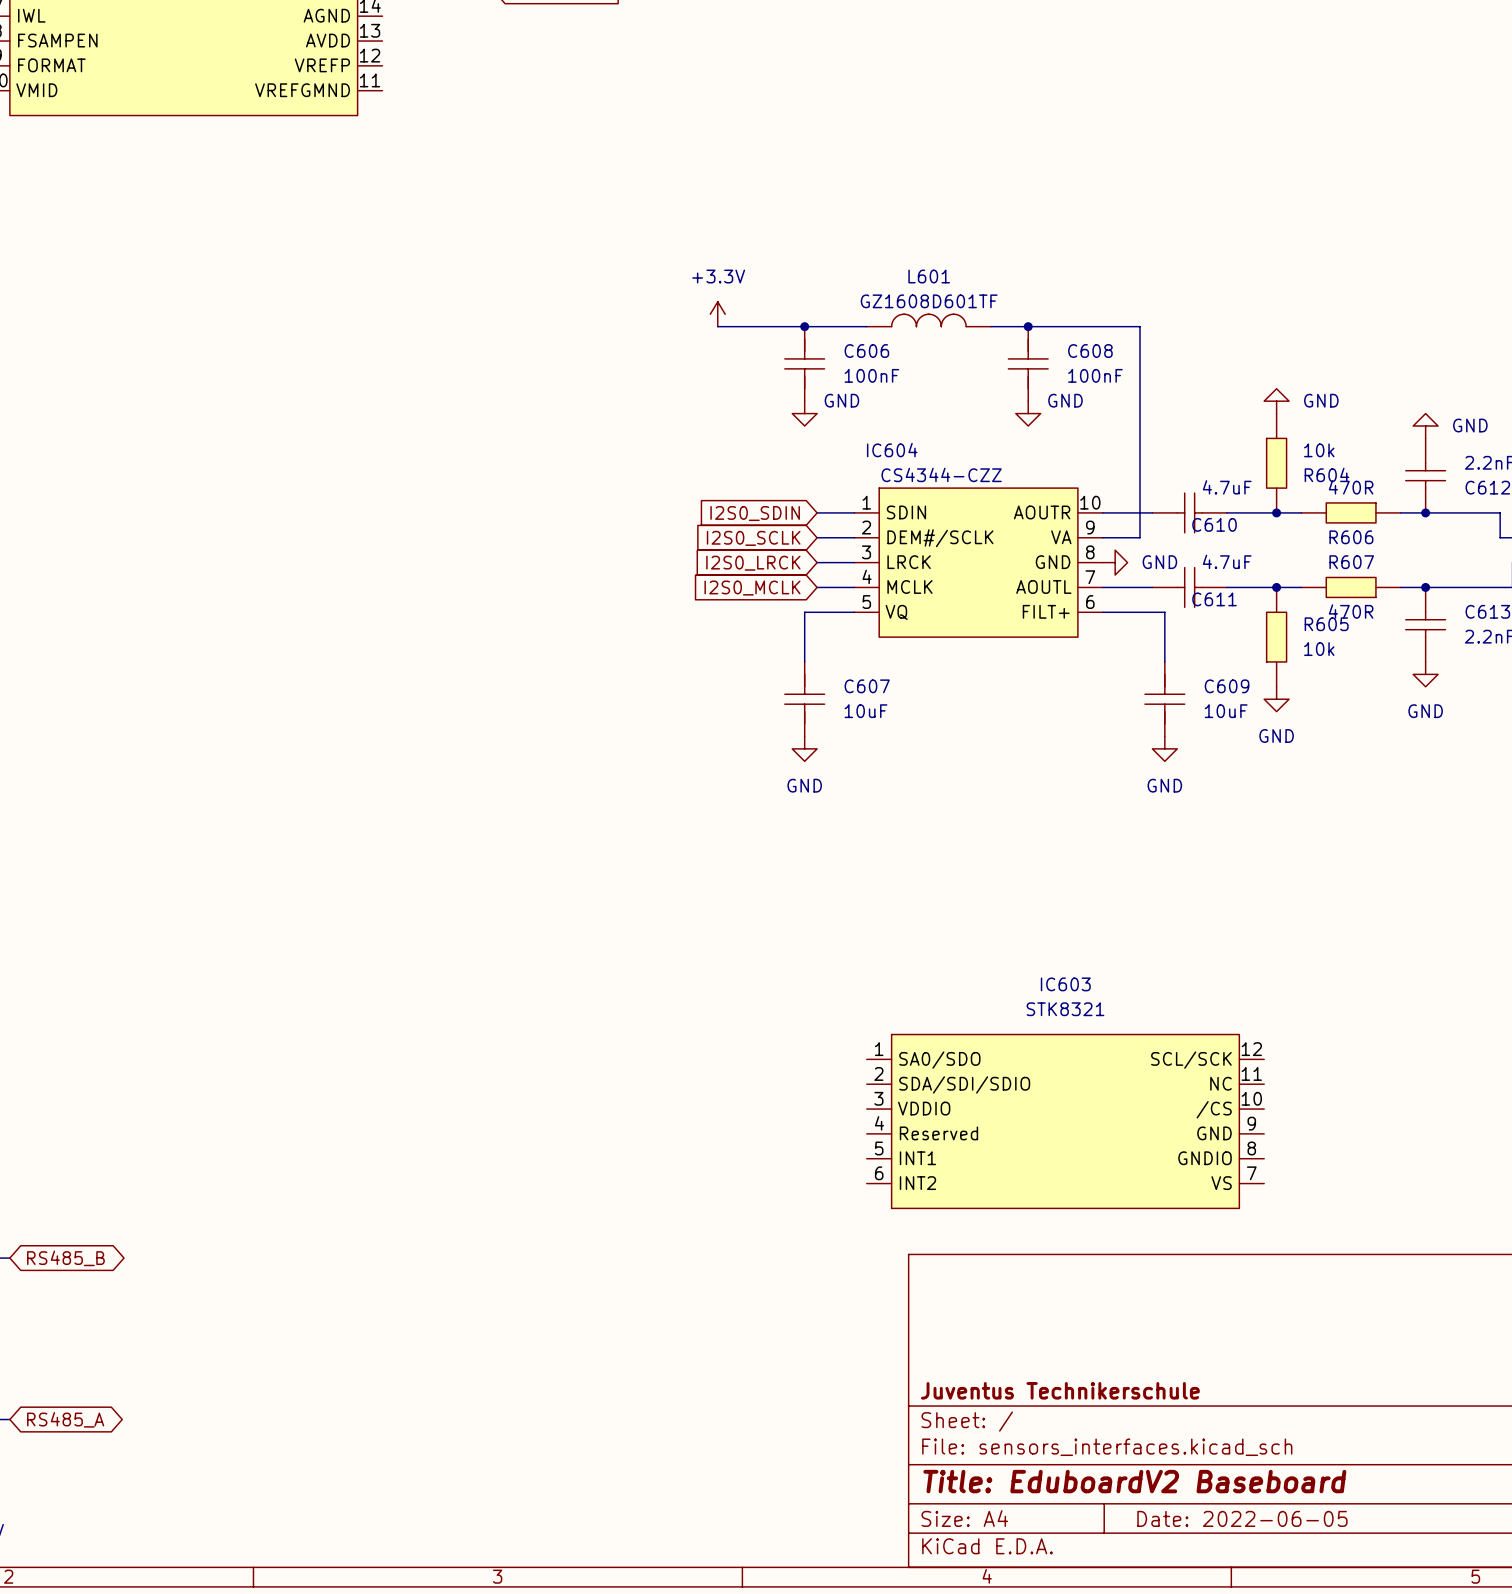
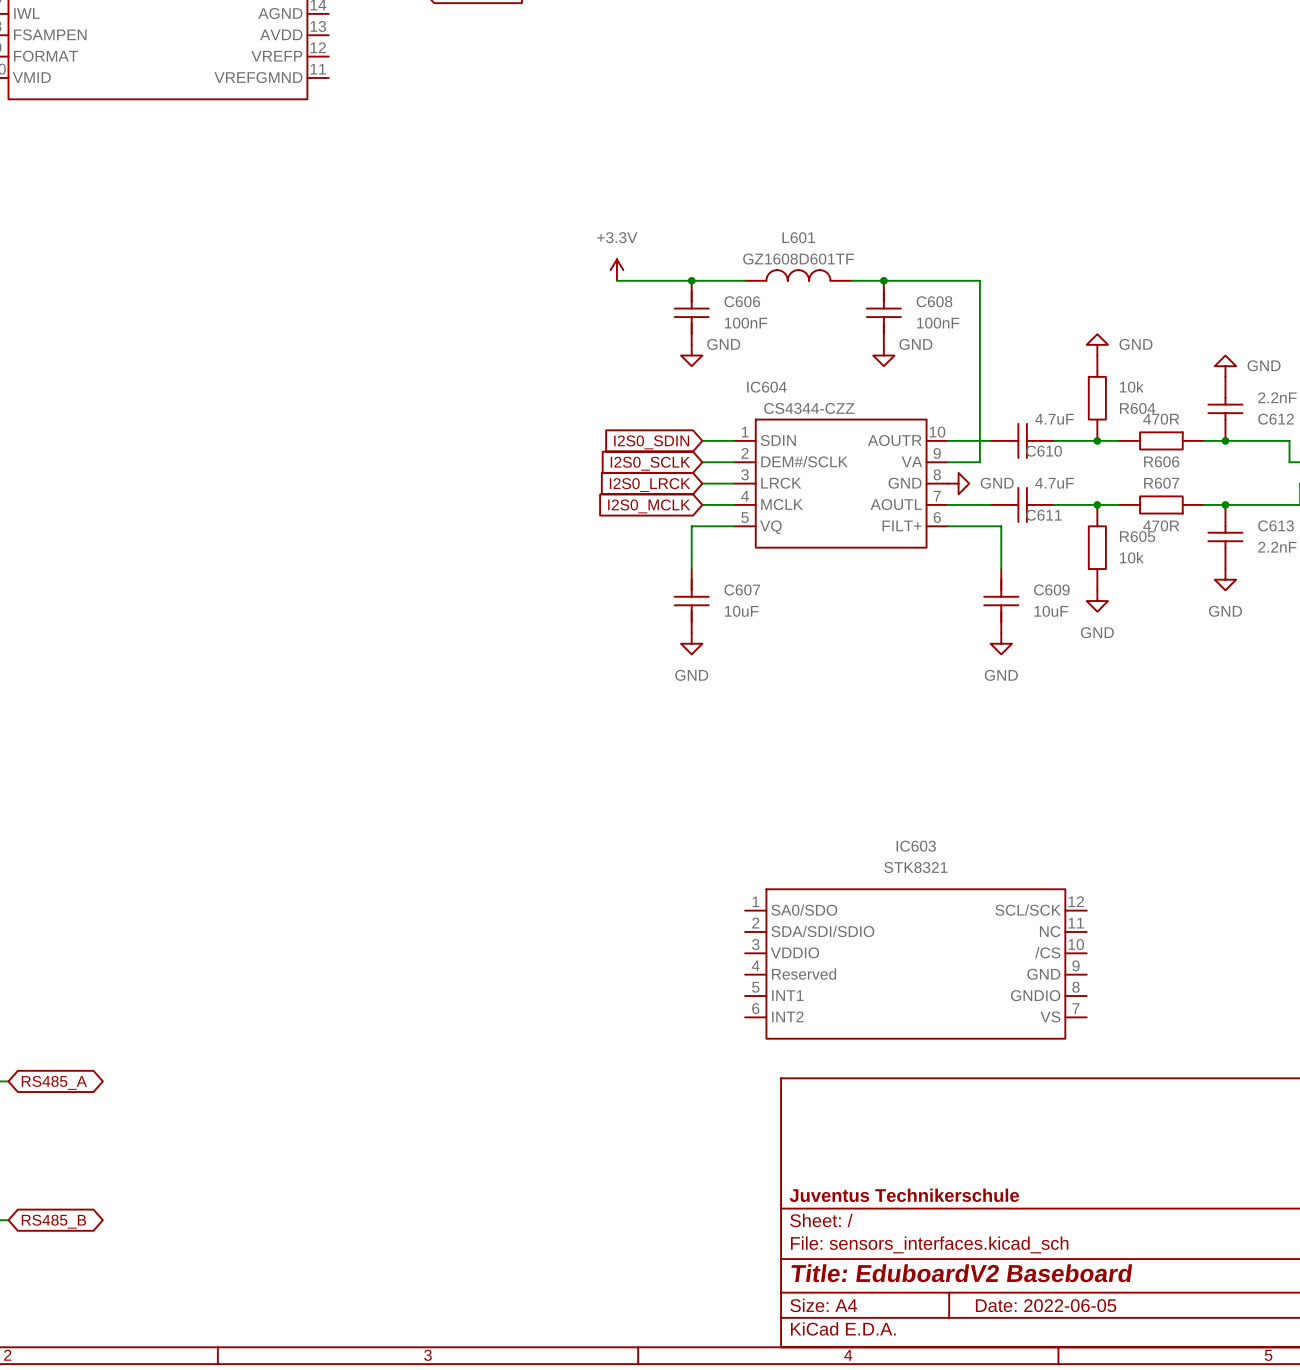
global label: RS485_B (65, 1258) -> RS485_A (54, 1082)
global label: RS485_A (65, 1419) -> RS485_B (53, 1221)

